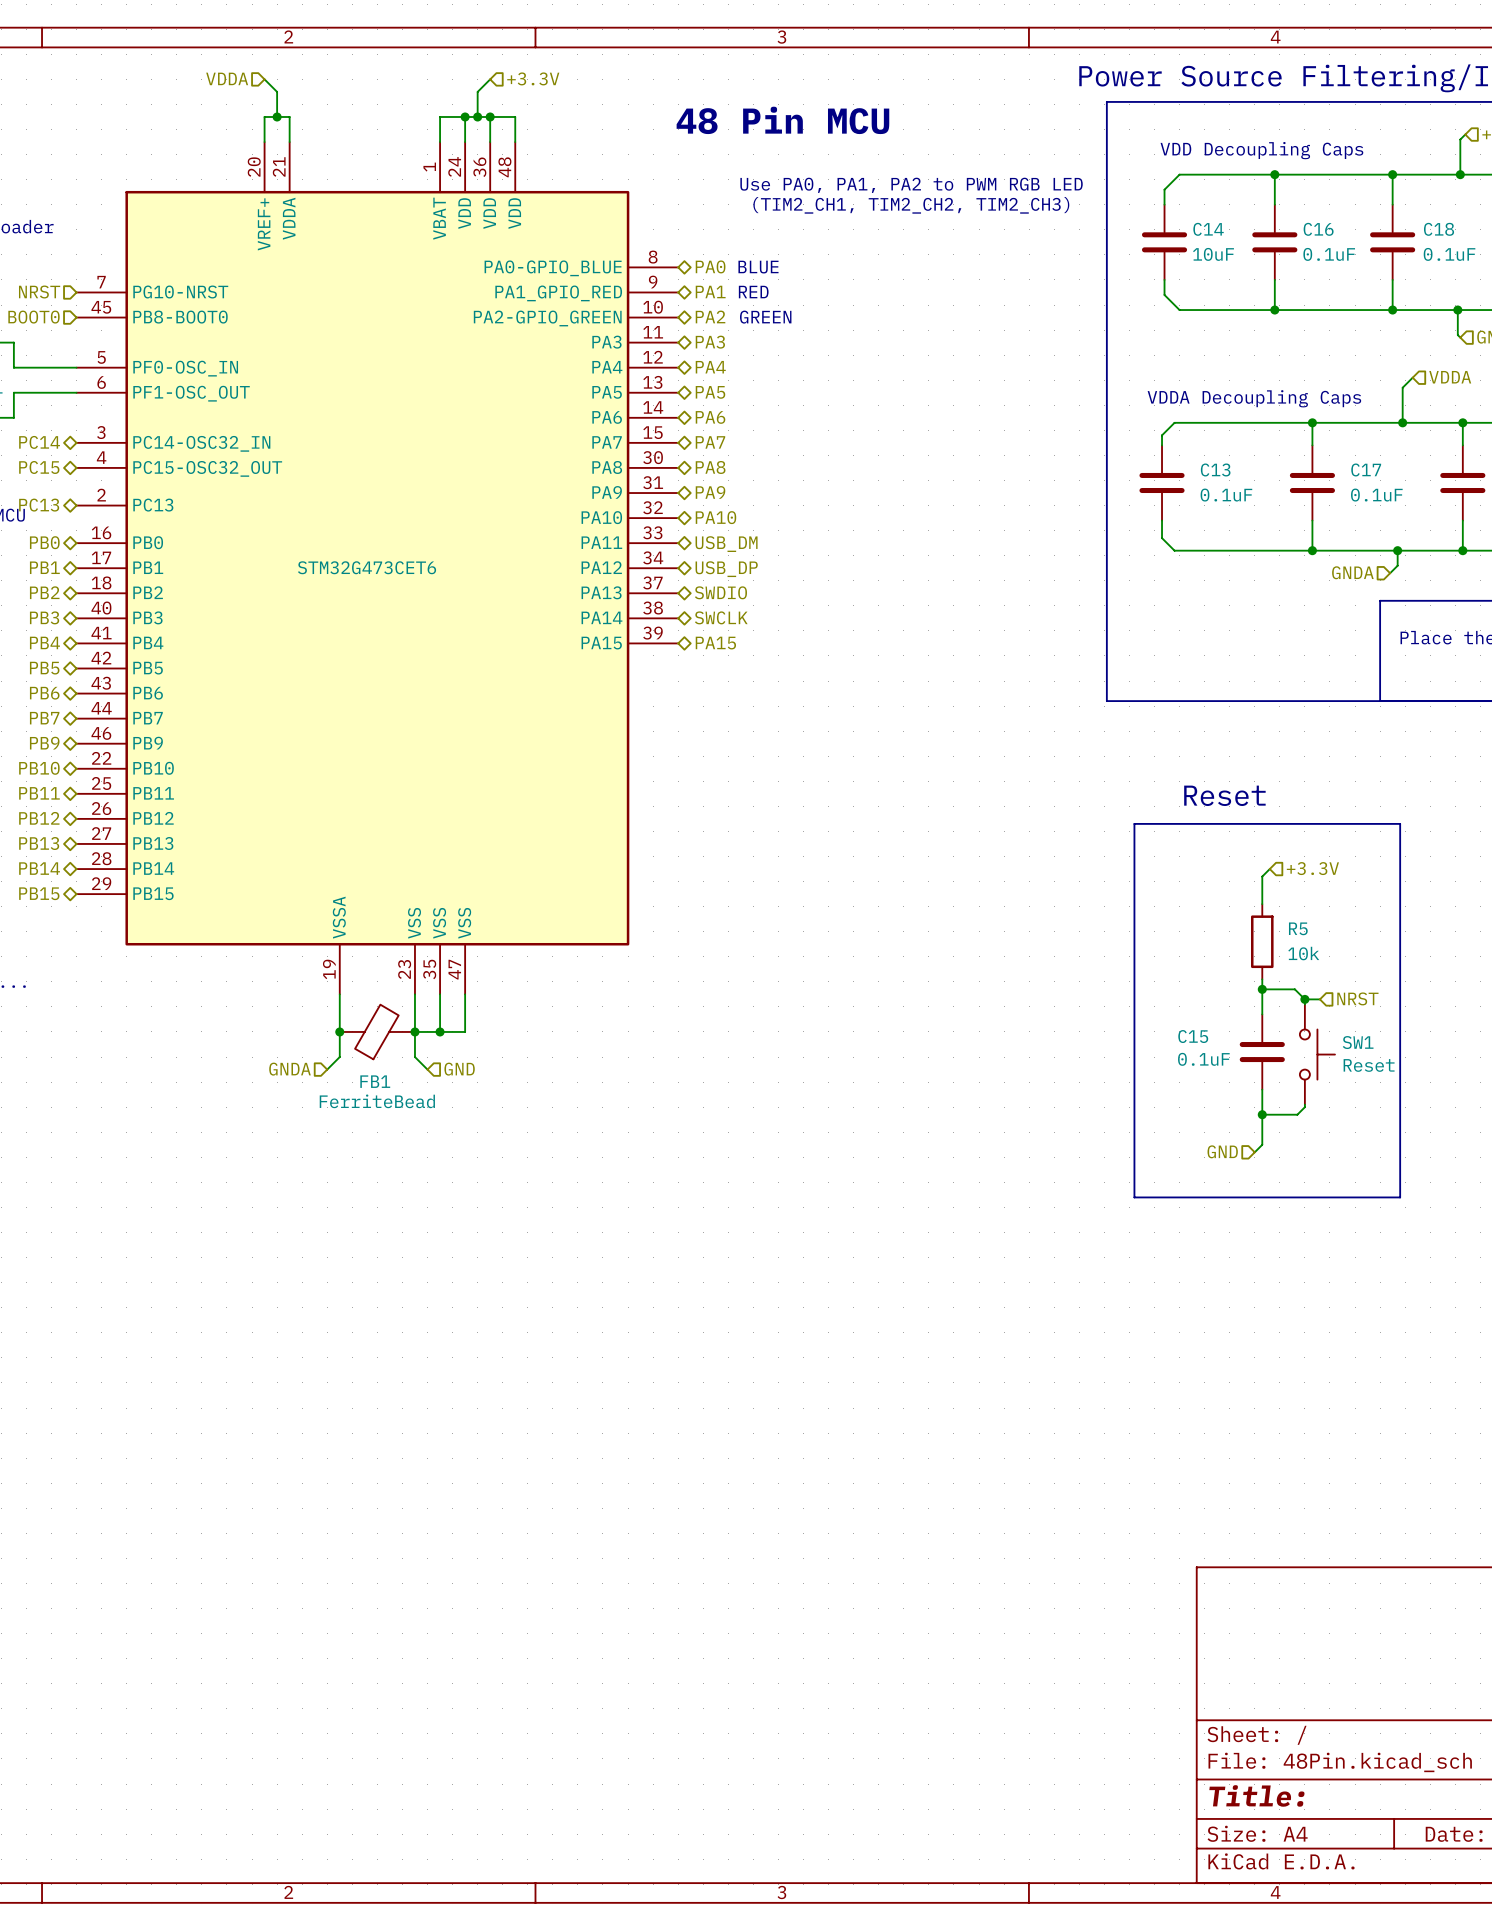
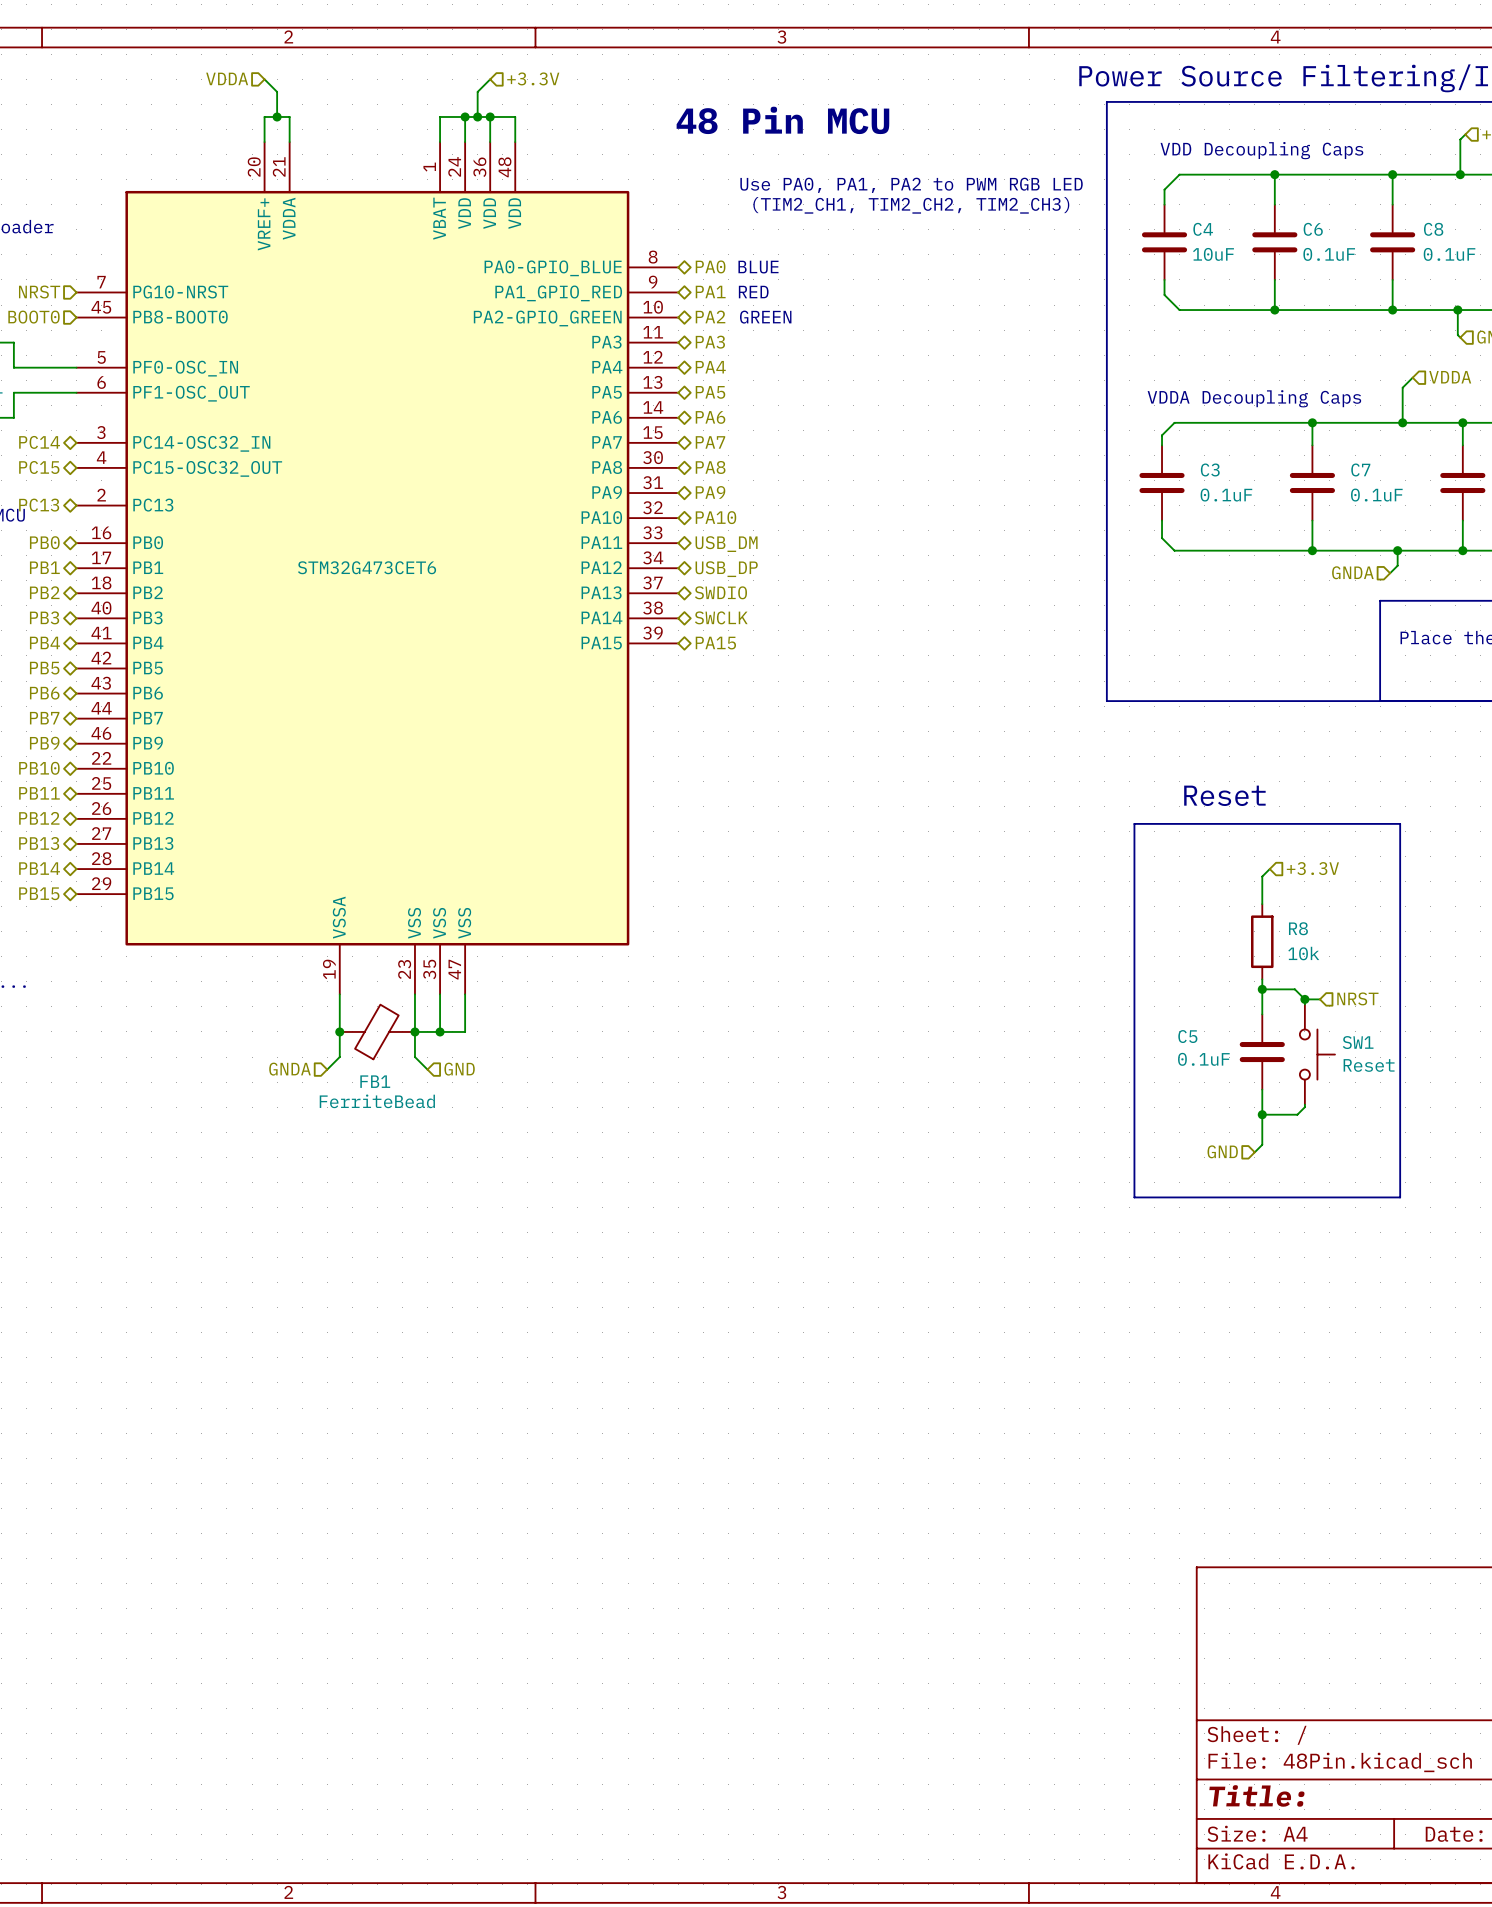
C14 name: C14 (1208, 229) -> C4 (1203, 229)
C16 name: C16 (1318, 229) -> C6 (1313, 229)
C18 name: C18 (1439, 229) -> C8 (1433, 229)
C13 name: C13 (1215, 469) -> C3 (1210, 469)
C17 name: C17 (1366, 469) -> C7 (1360, 469)
R5 name: R5 (1298, 928) -> R8 (1298, 928)
C15 name: C15 (1193, 1036) -> C5 (1187, 1036)

